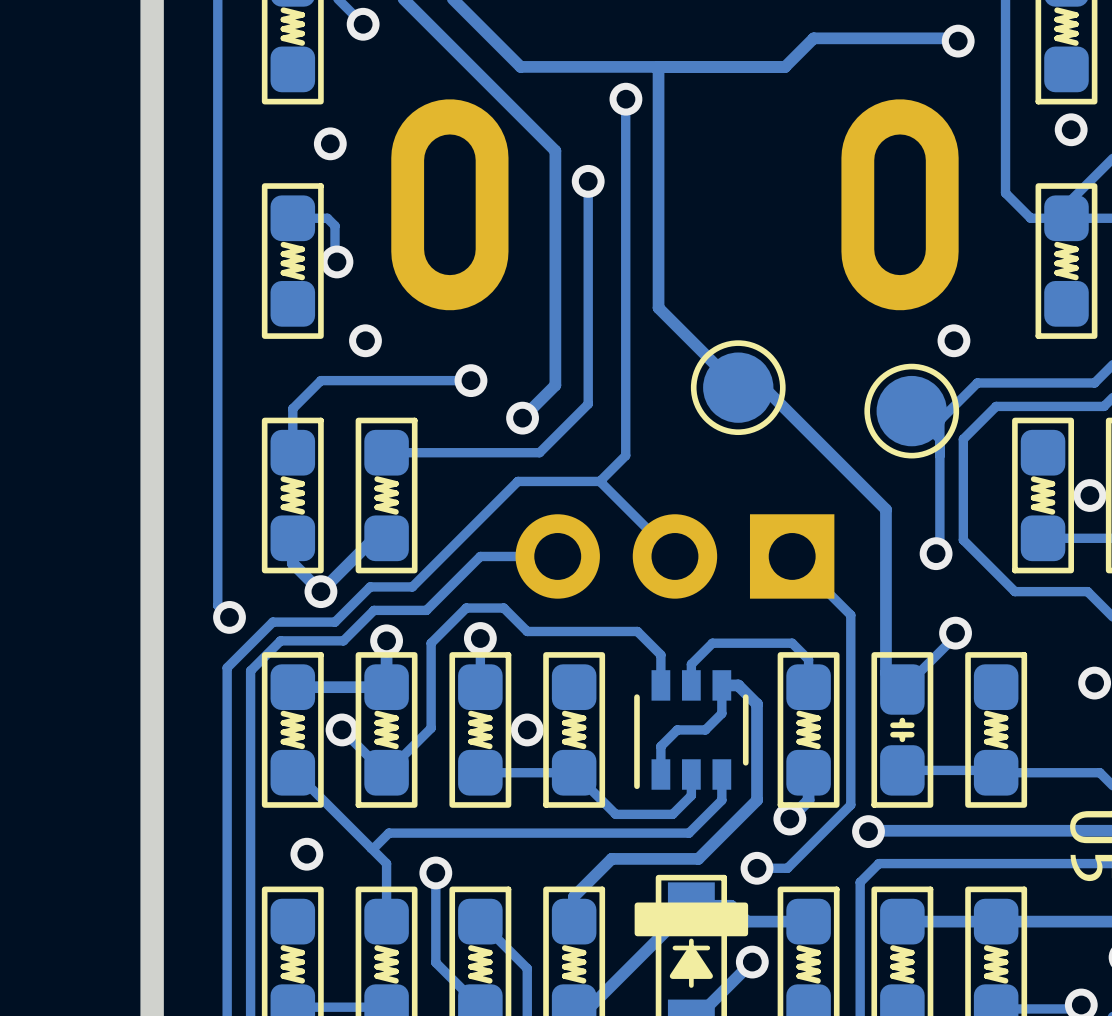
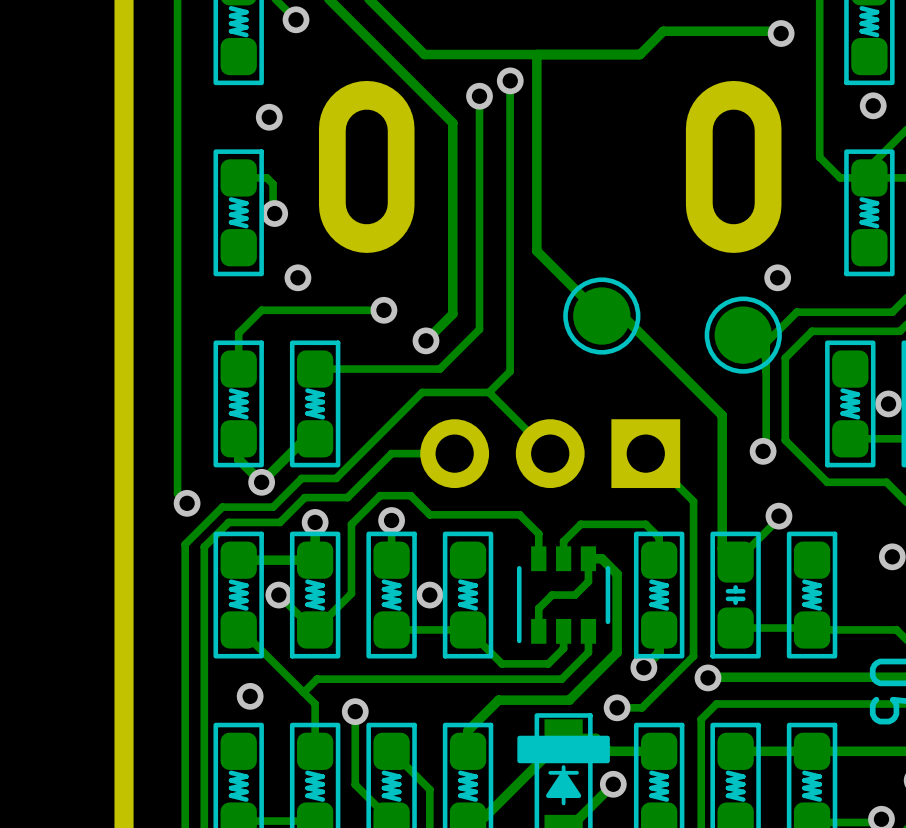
track: none -> (479, 96) (479, 147)
via position: (588, 181) -> (479, 96)

